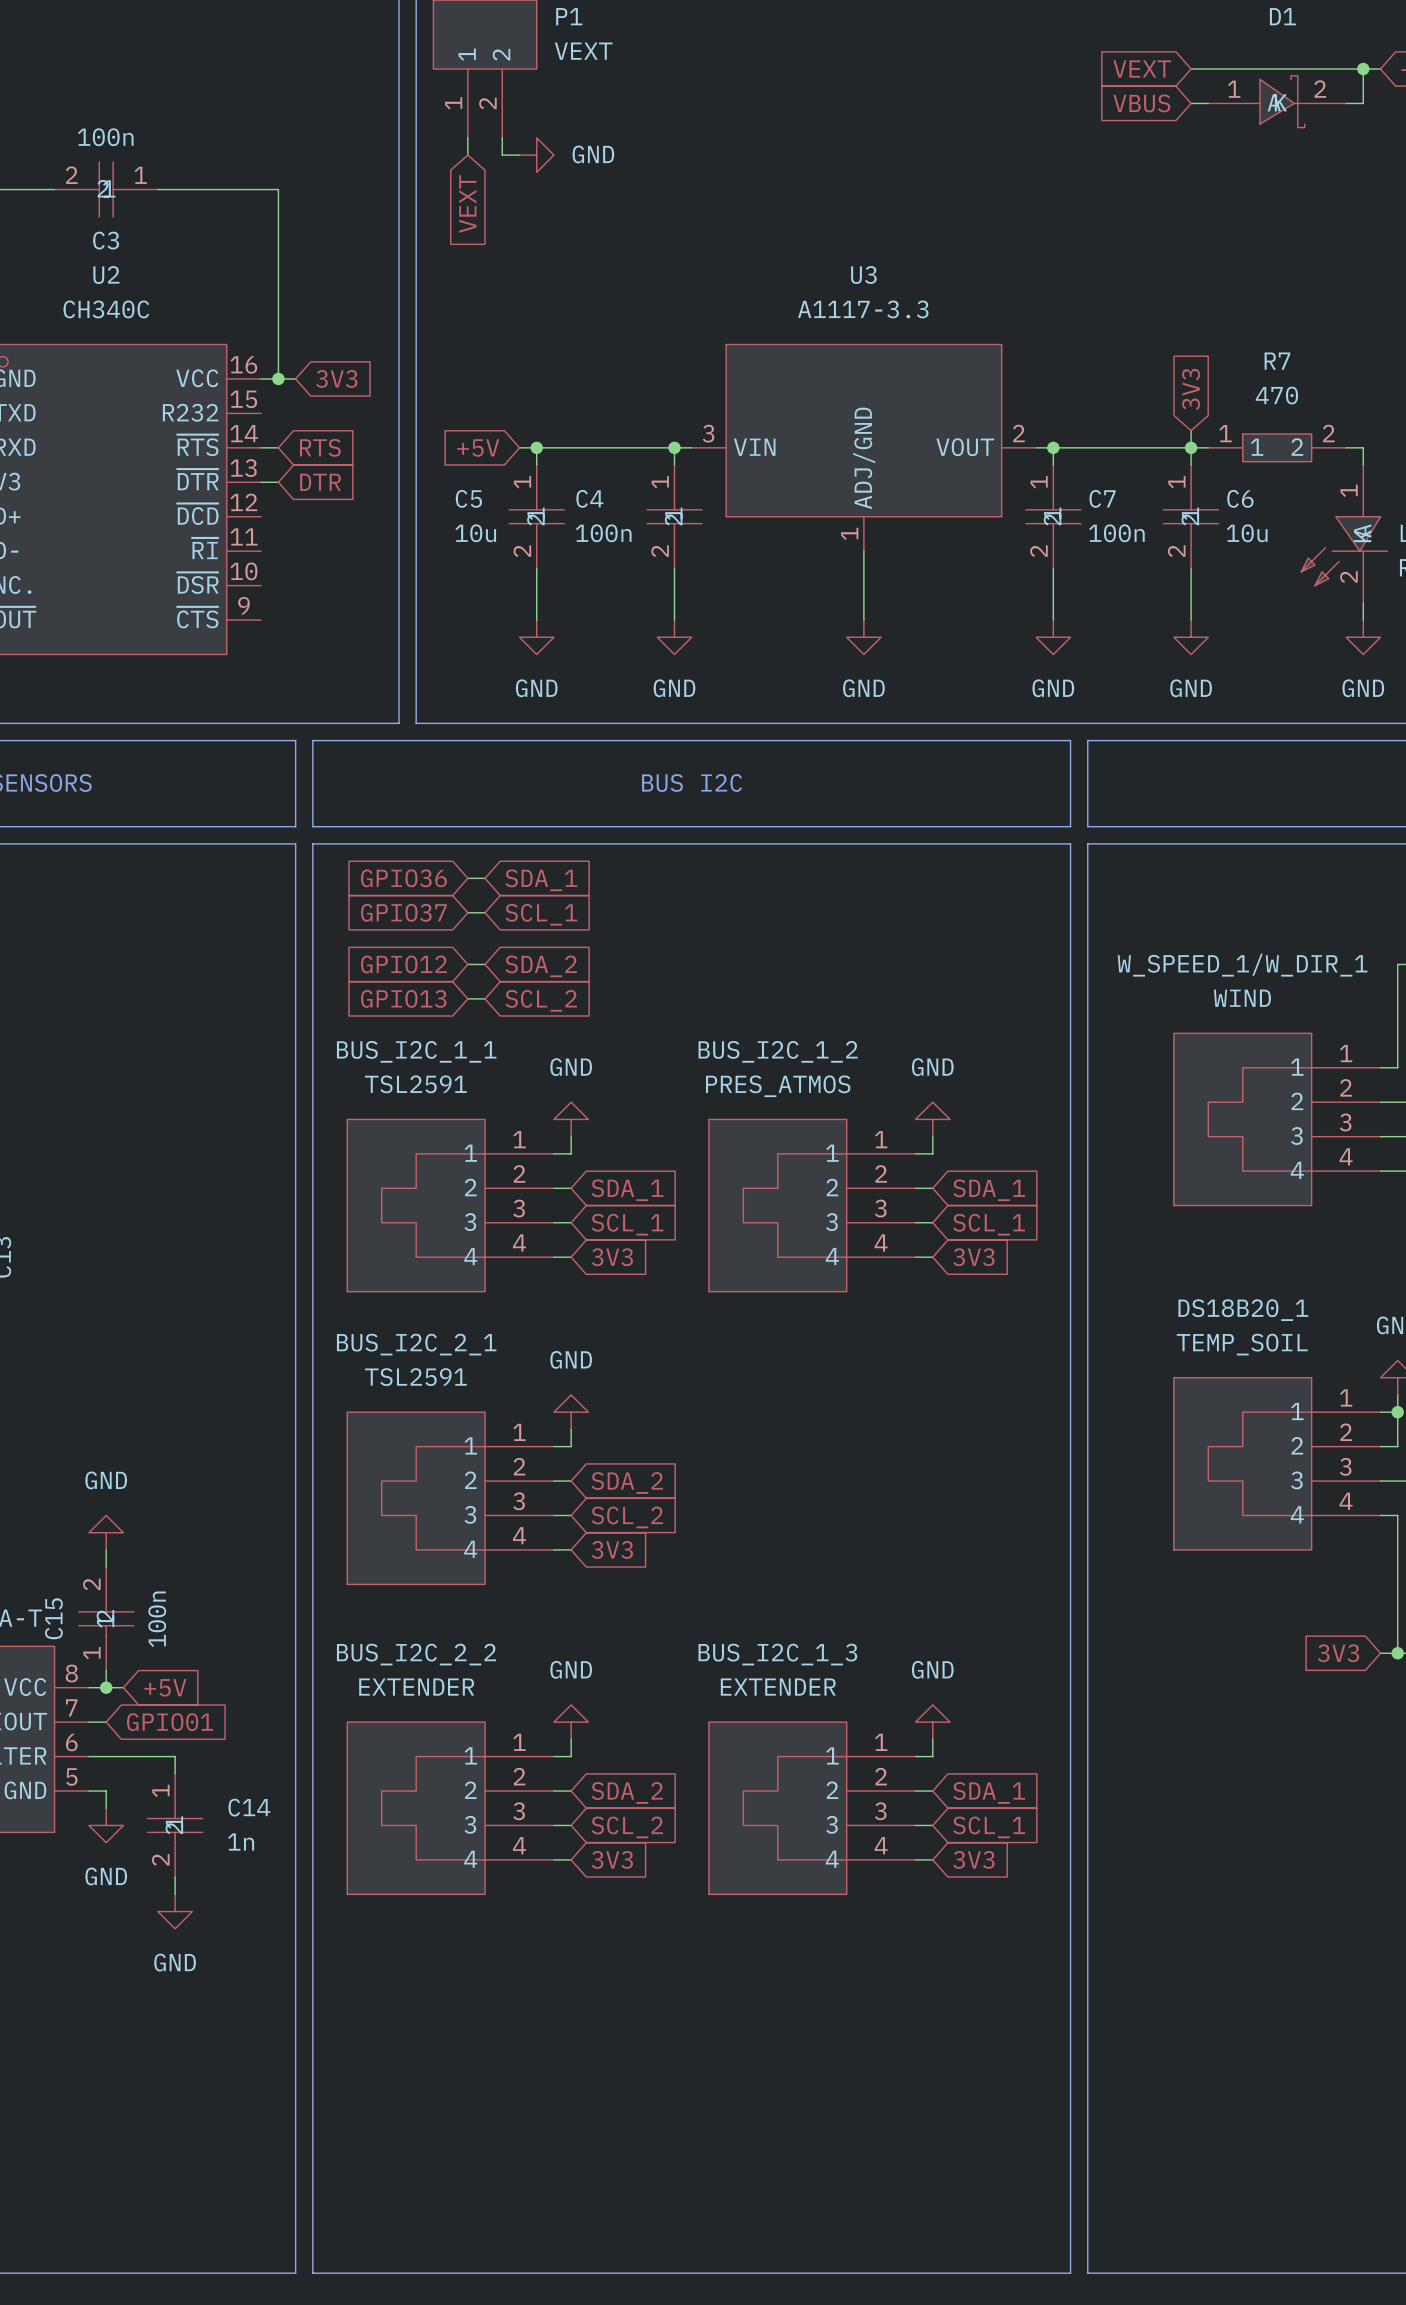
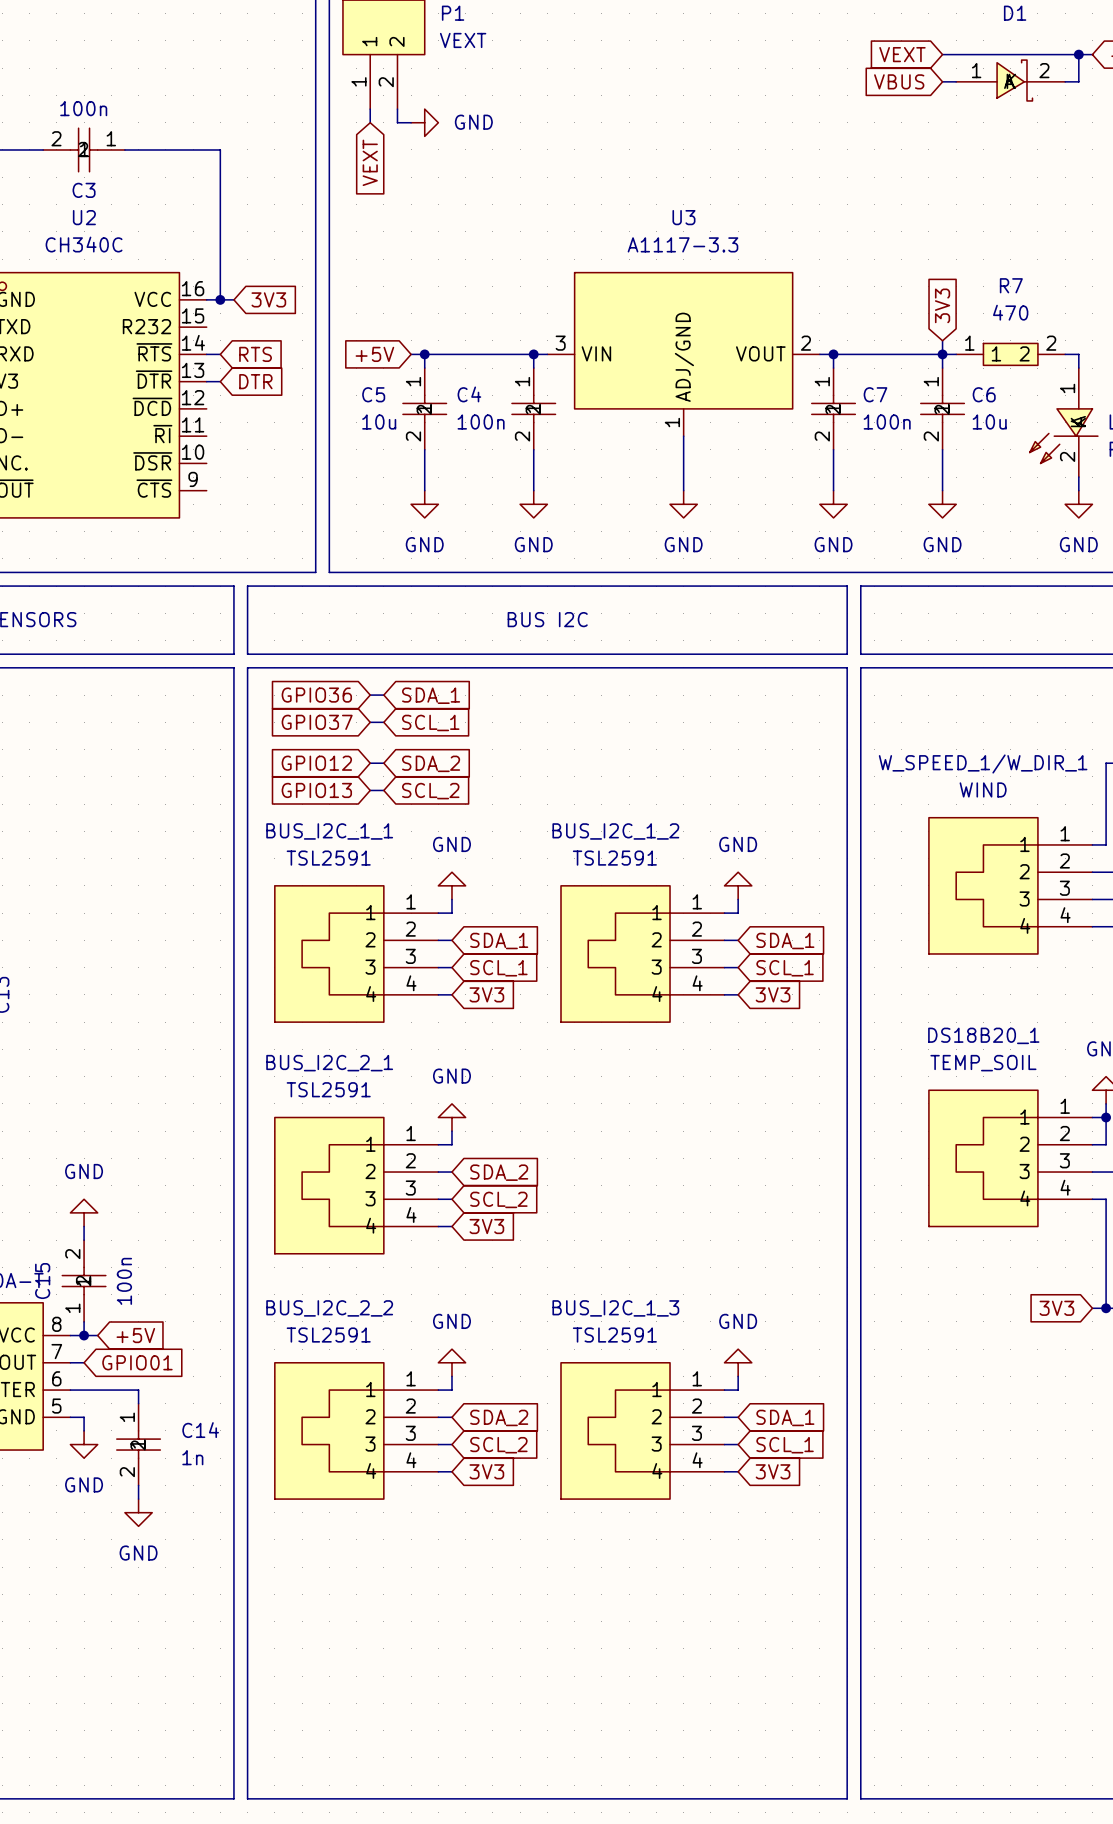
BUS_I2C_1_2 value: PRES_ATMOS (778, 1086) -> TSL2591 (614, 858)
BUS_I2C_2_2 value: EXTENDER (416, 1687) -> TSL2591 (328, 1335)
BUS_I2C_1_3 value: EXTENDER (778, 1687) -> TSL2591 (614, 1335)

